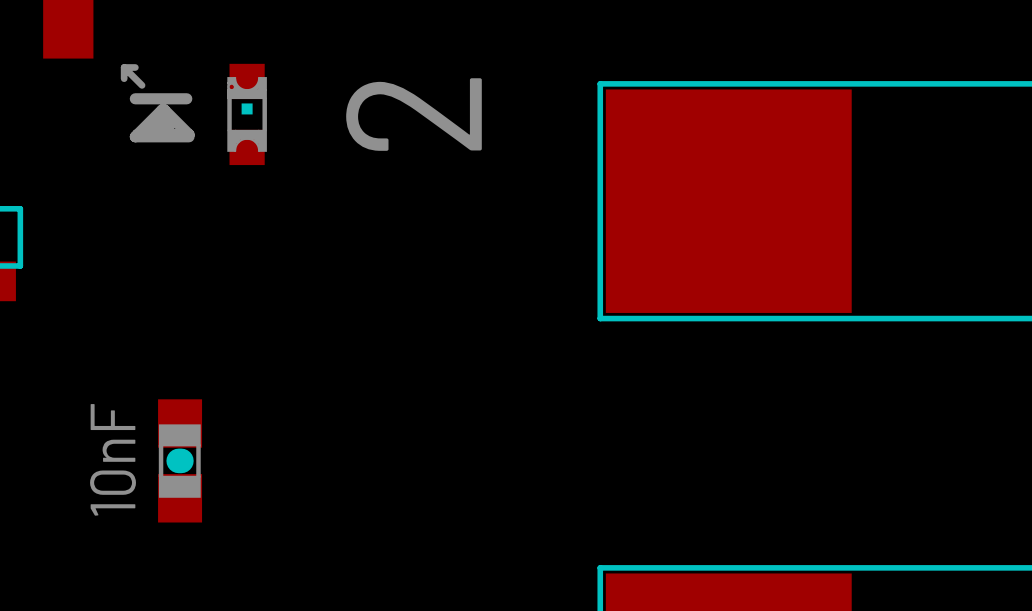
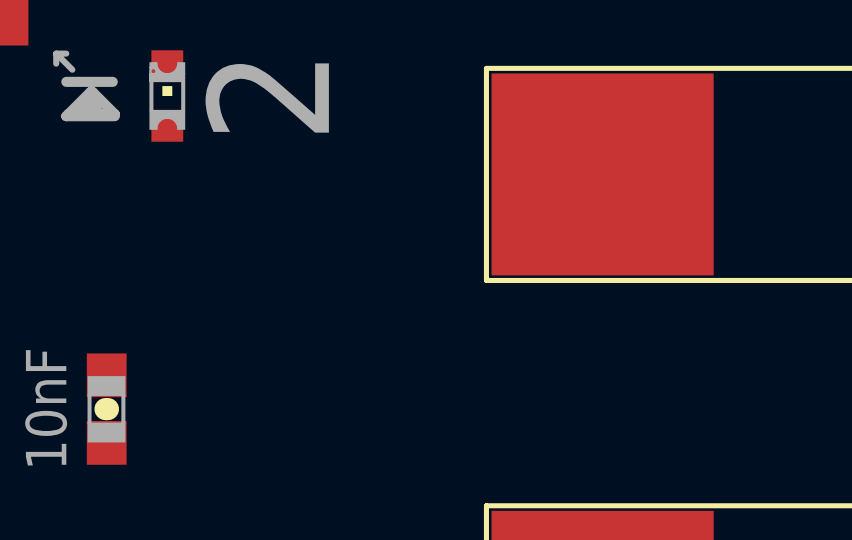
text position: 2 (413, 114) -> 2 (267, 98)

